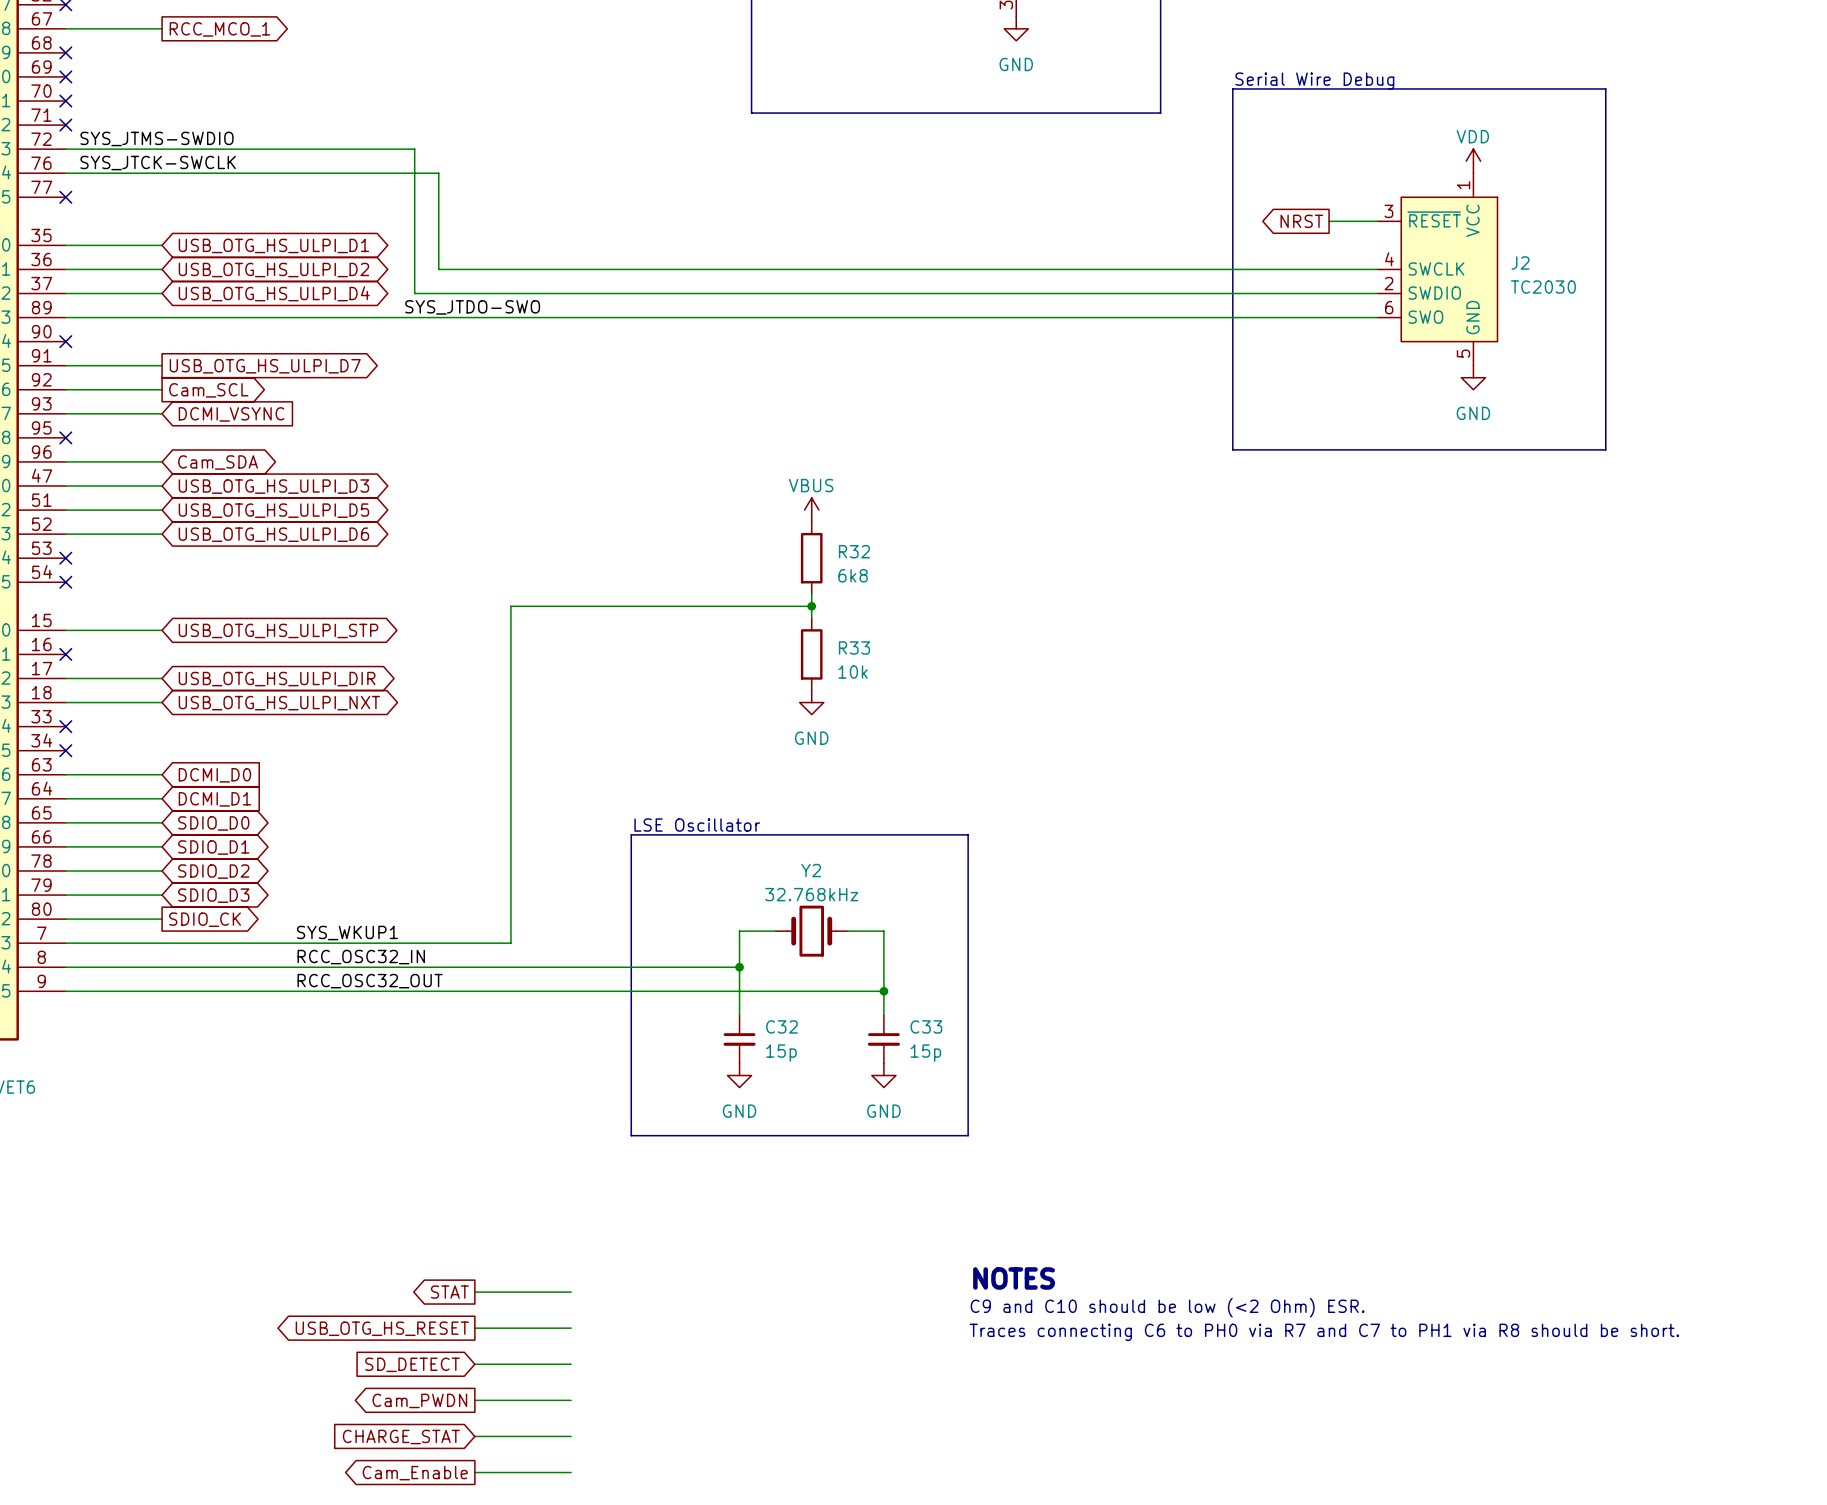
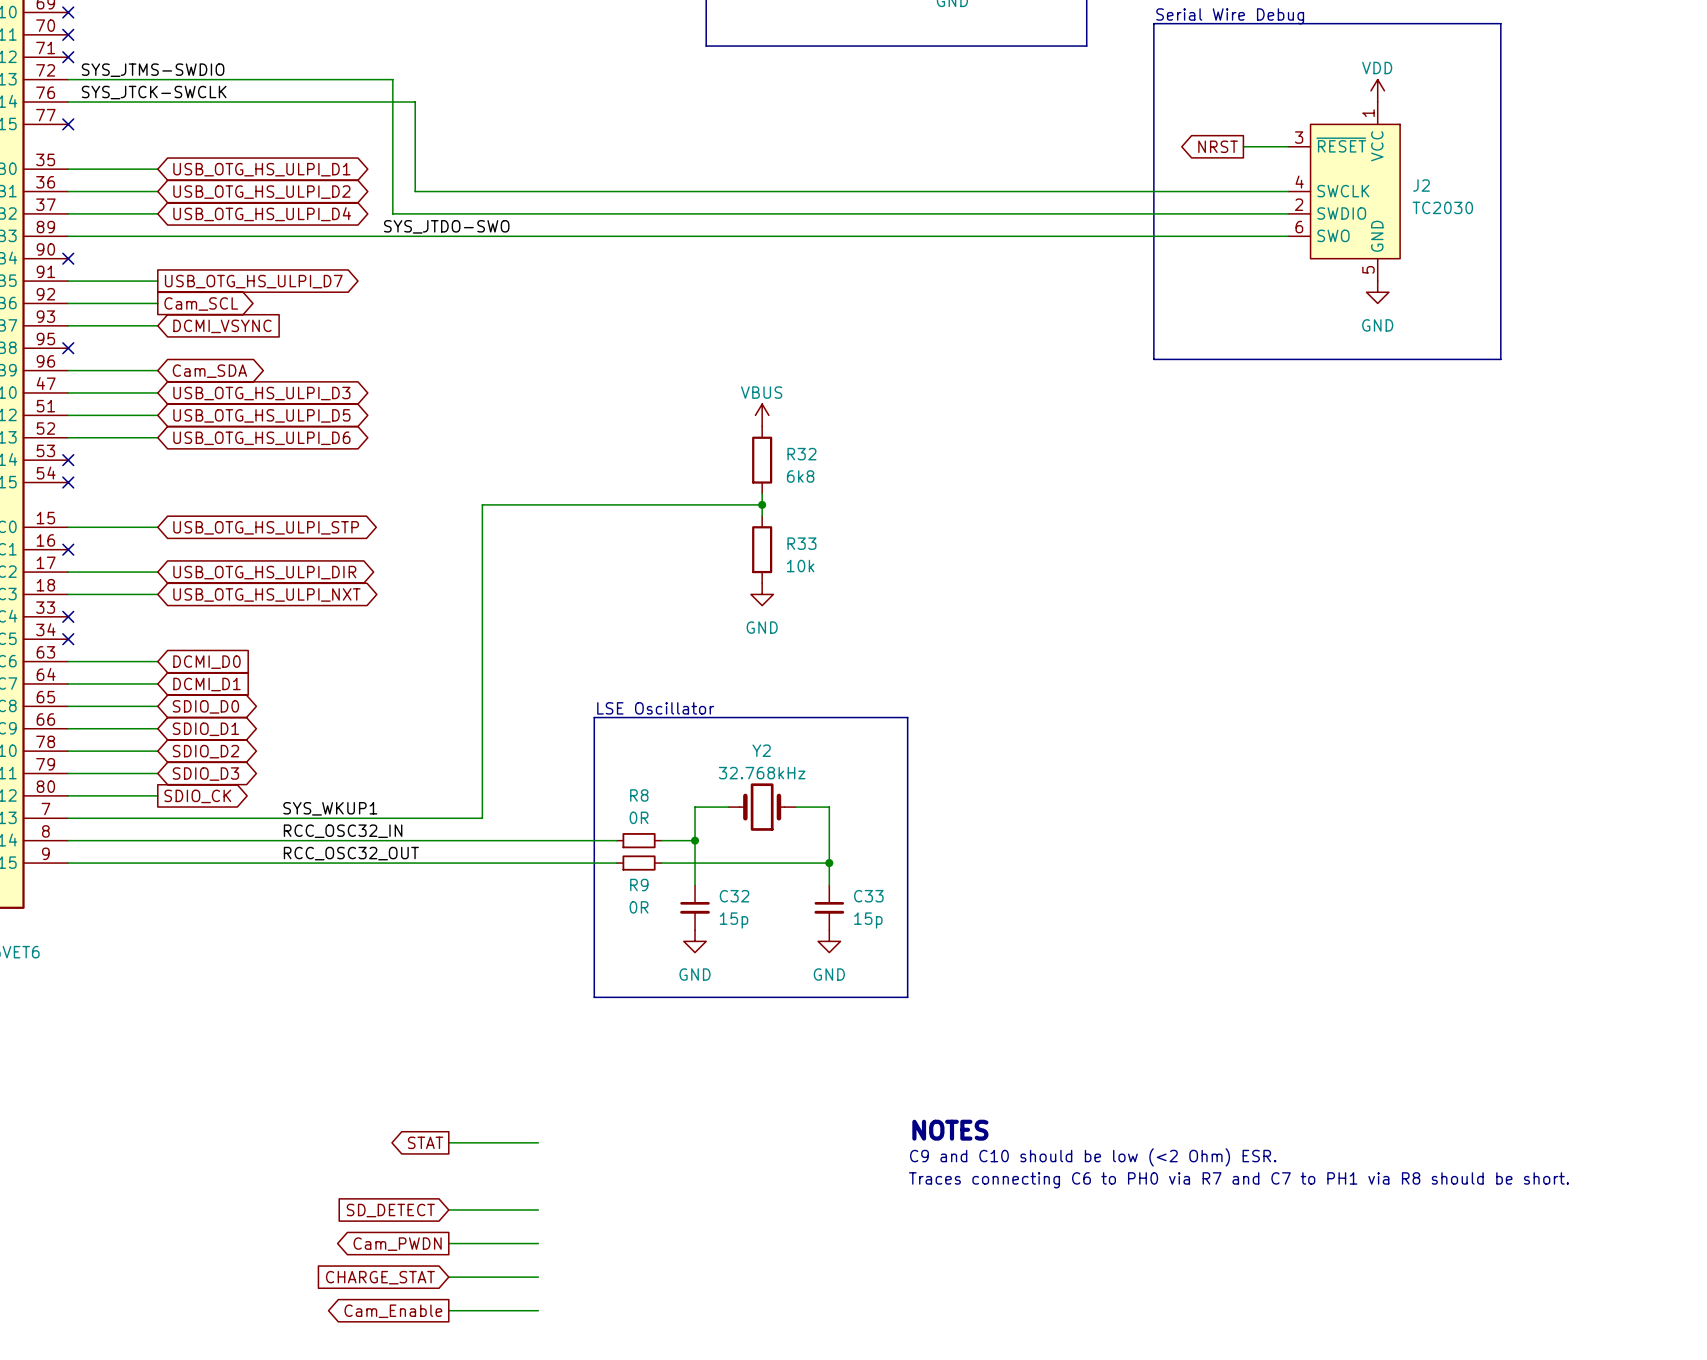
wire: (655, 967) (703, 967) -> none
R8: none -> 0R (639, 840)
wire: (655, 991) (703, 991) -> none
R9: none -> 0R (639, 863)
global label: USB_OTG_HS_RESET (382, 1328) -> none
wire: (474, 1328) (571, 1328) -> none

